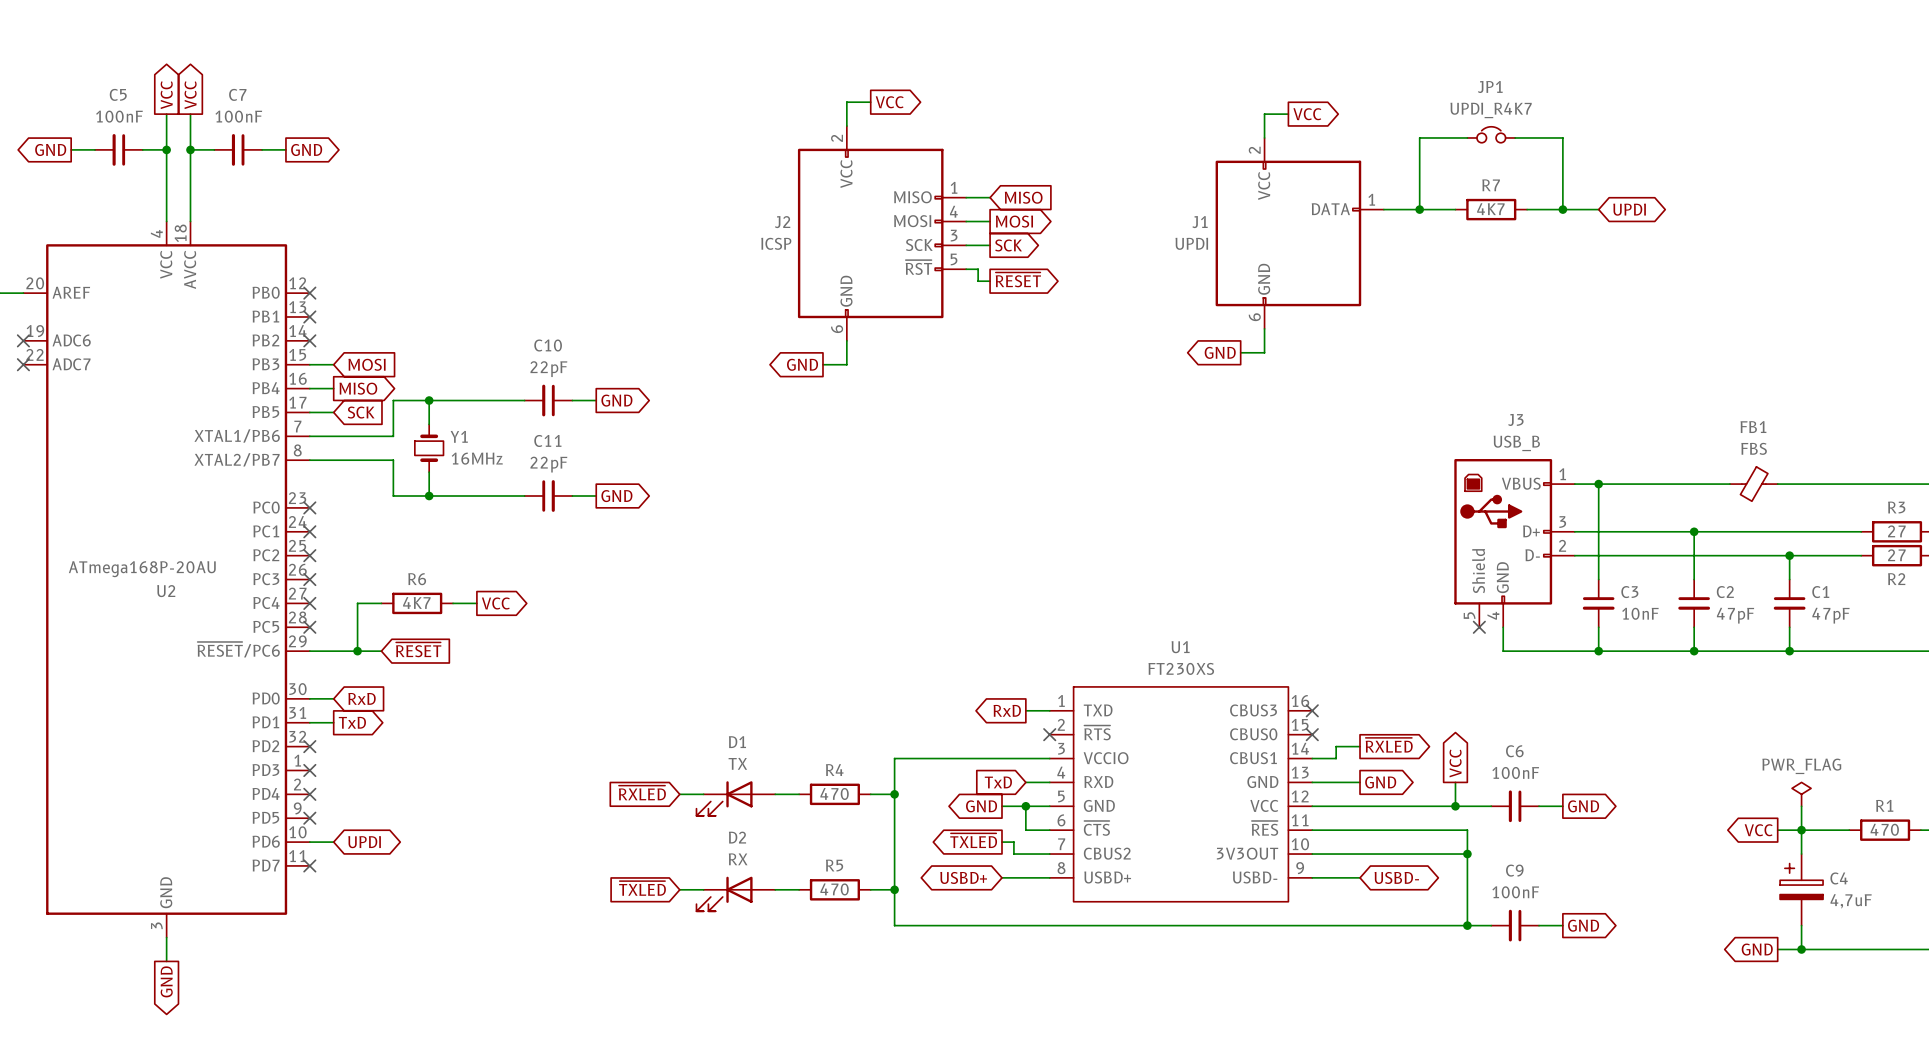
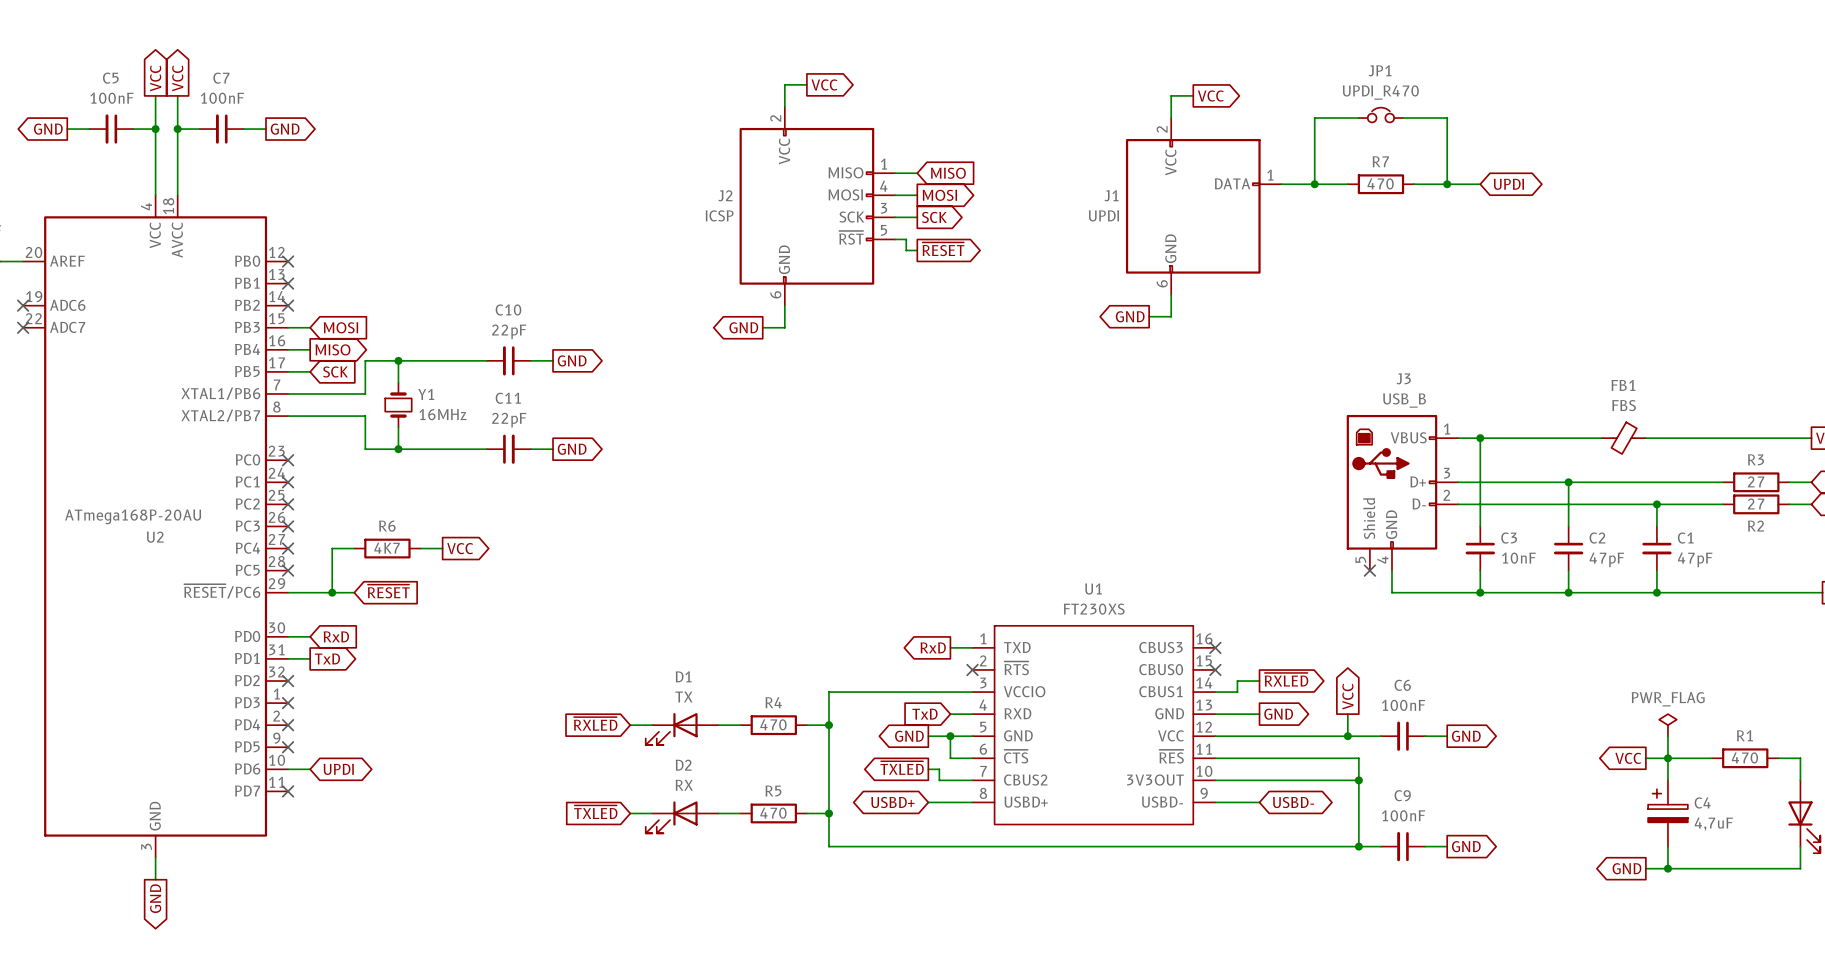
JP1 value: UPDI_R4K7 (1491, 110) -> UPDI_R470 (1380, 92)
R7 value: 4K7 (1490, 209) -> 470 (1380, 183)

